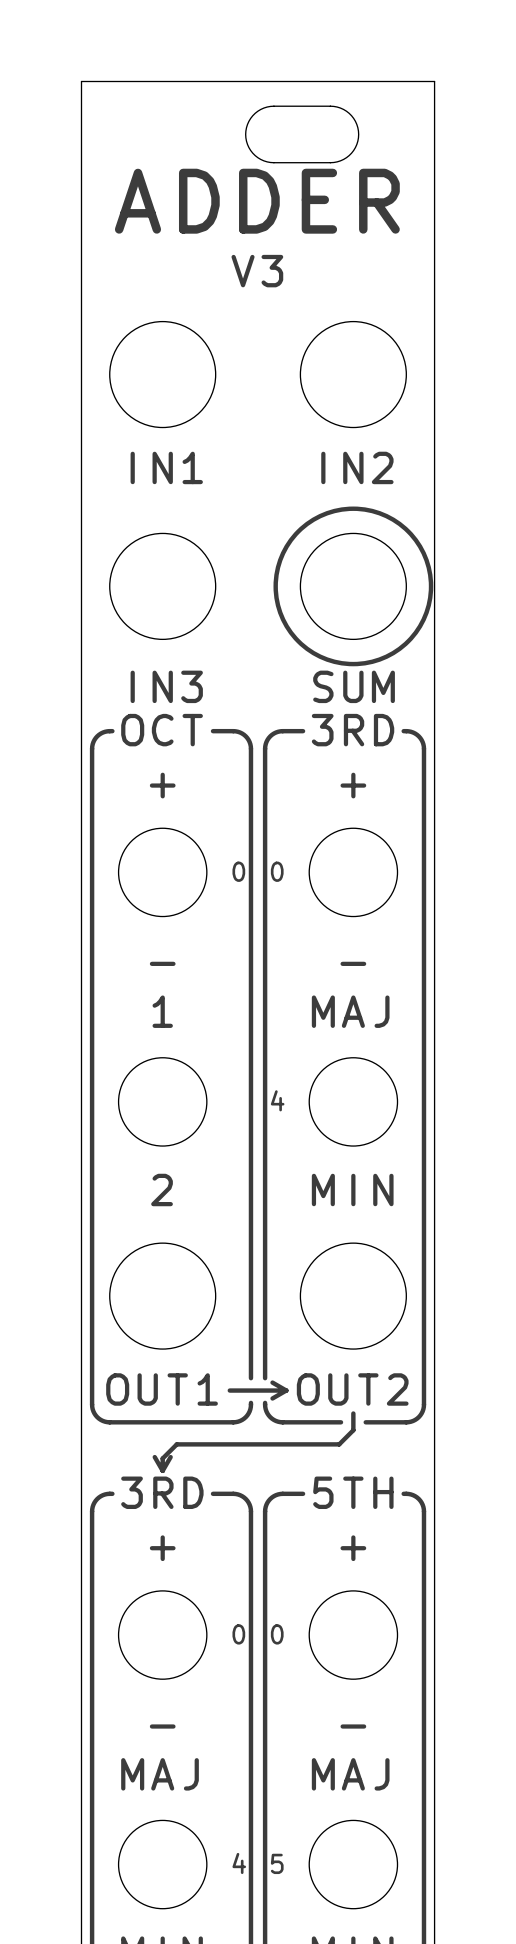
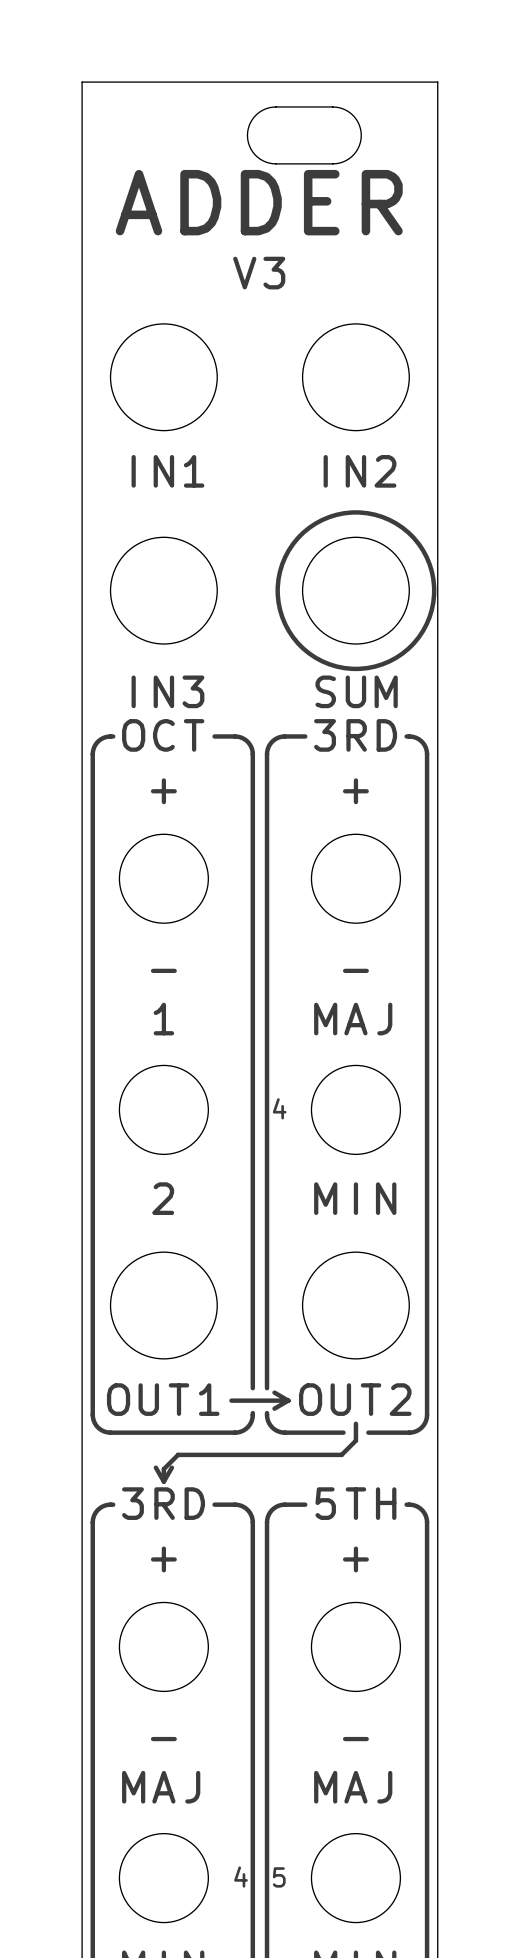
text: 0 (238, 871) -> none
text: 0 (277, 871) -> none
text: 0 (238, 1634) -> none
text: 0 (277, 1634) -> none

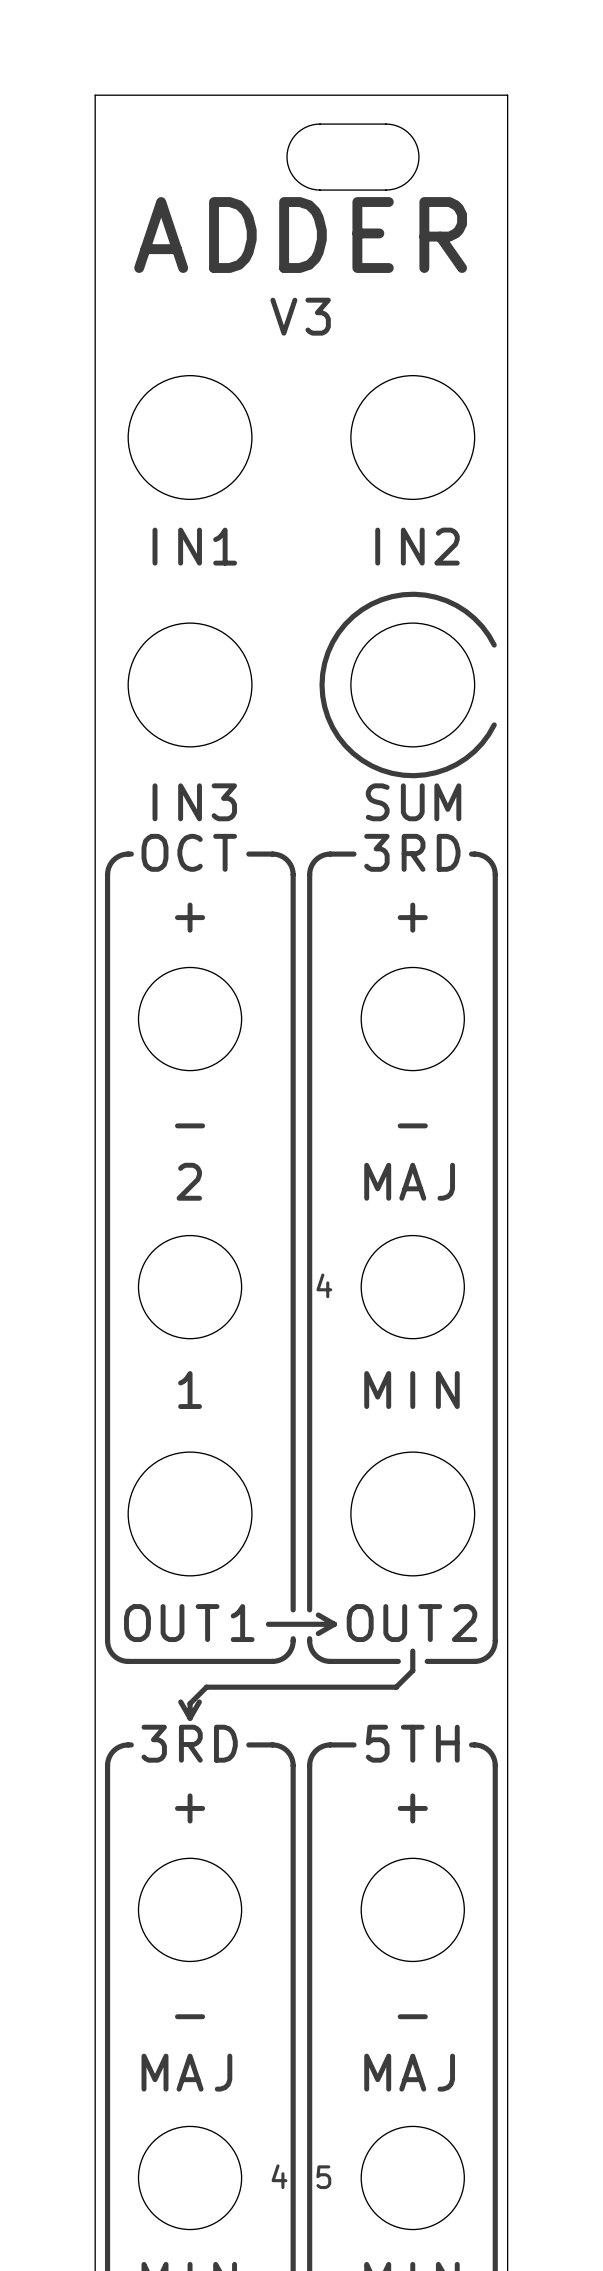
drawing: [275, 510, 437, 672] -> none
line: none -> (494, 645) (474, 618) (446, 600) (414, 594) (392, 596) (371, 604) (345, 624) (328, 652) (322, 684) (328, 717) (345, 745) (361, 760) (392, 773) (414, 775) (446, 769) (474, 751) (494, 724)
text: 1 (163, 1019) -> 2 (189, 1181)
text: 2 (163, 1198) -> 1 (190, 1390)

